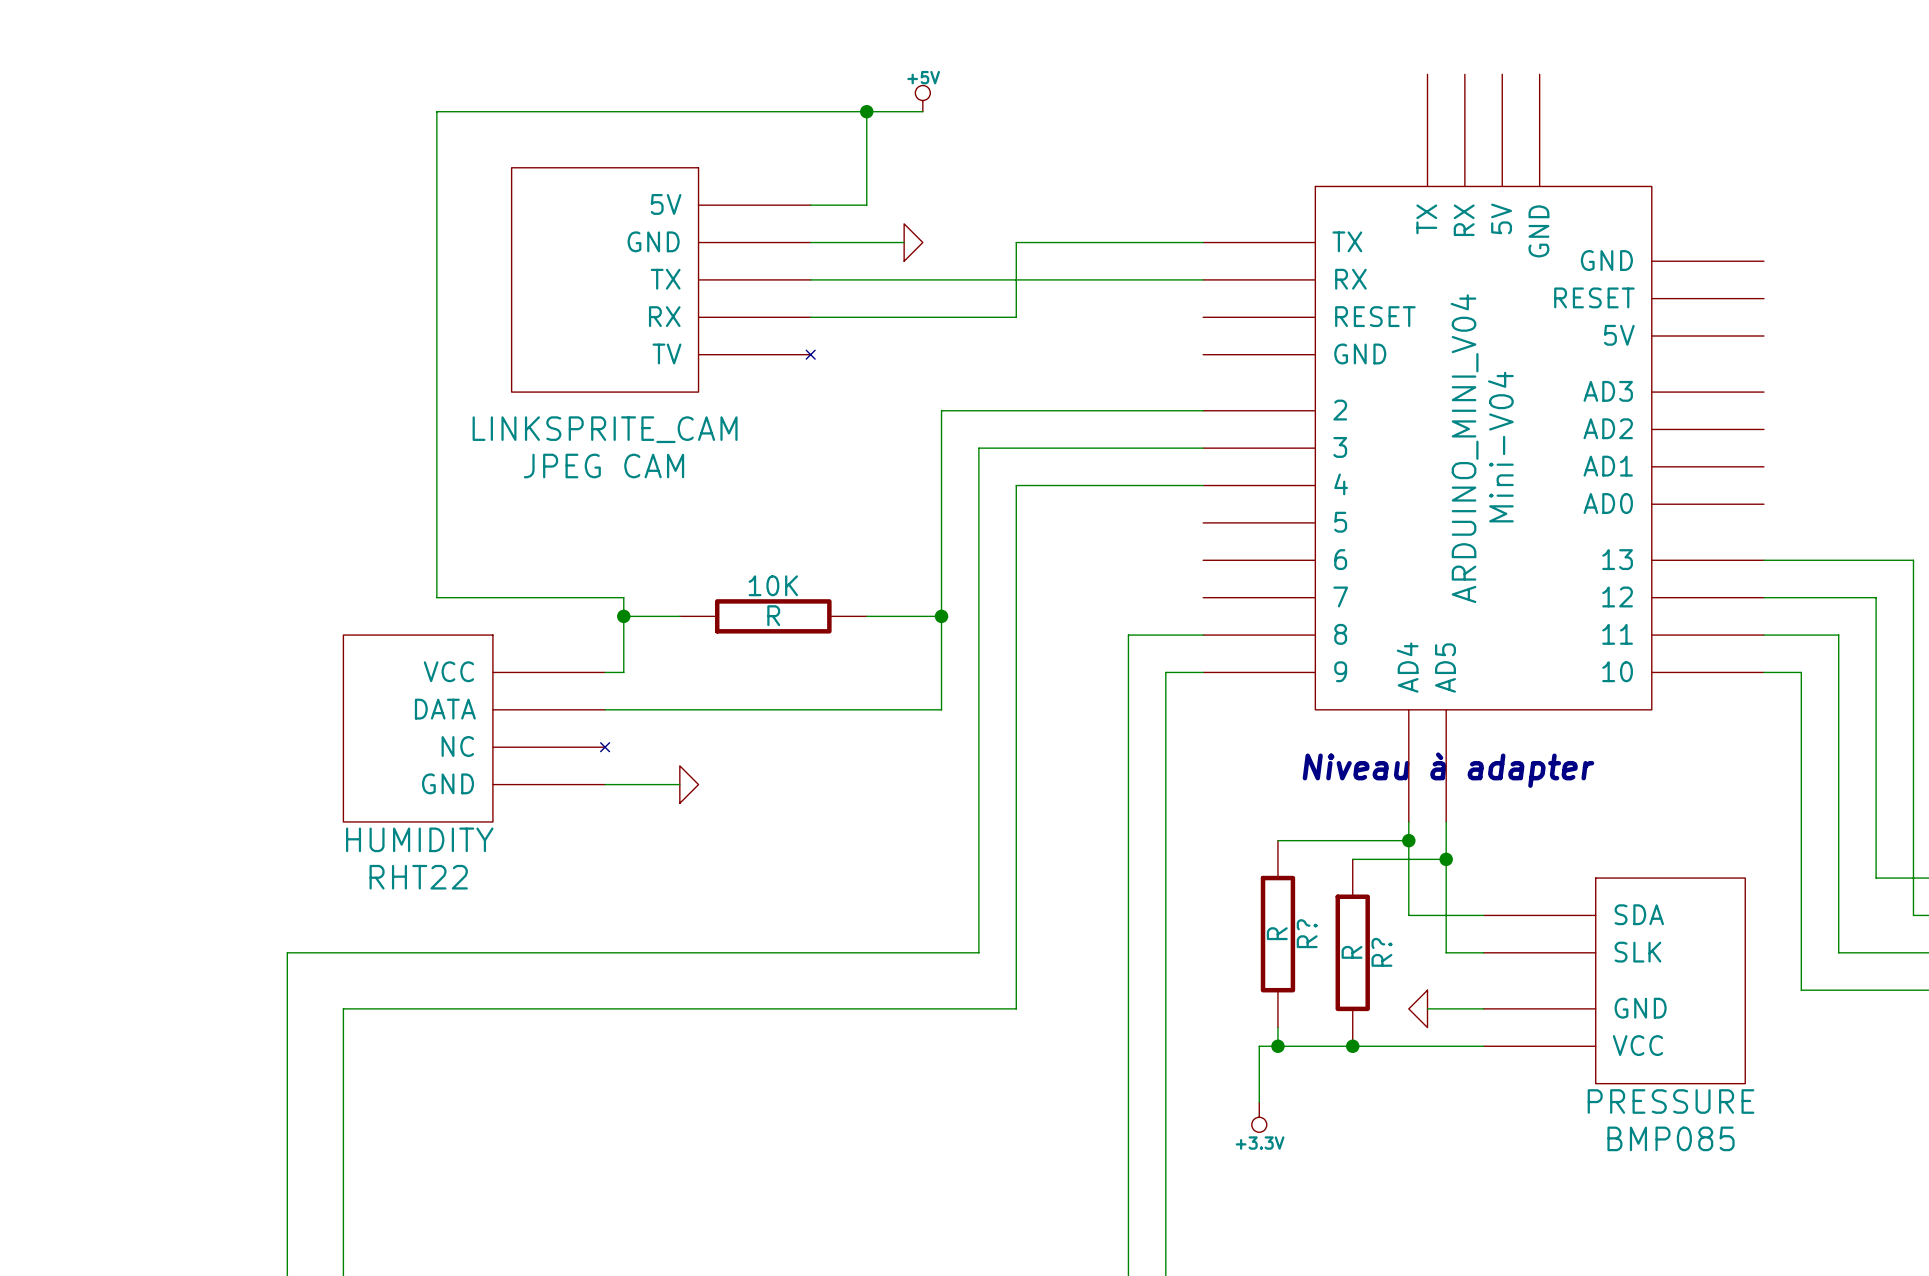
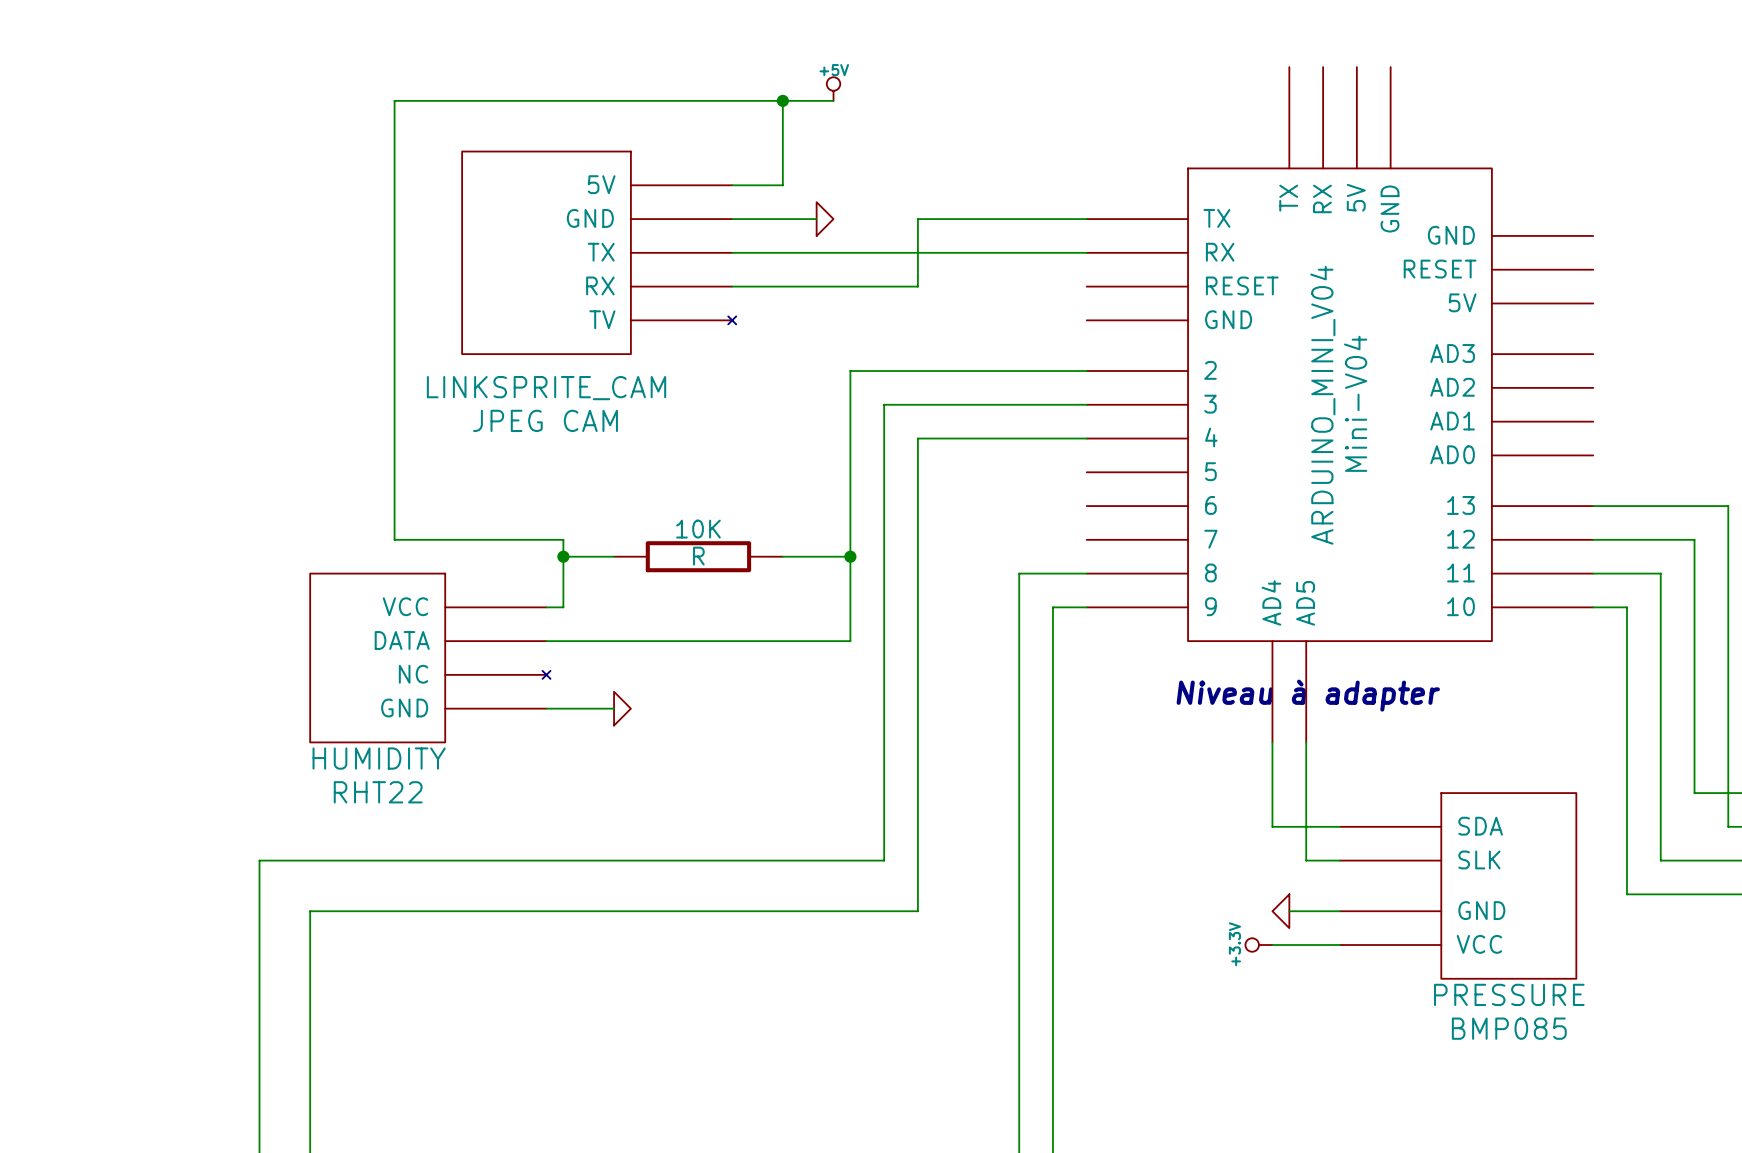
wire: (1277, 840) (1408, 840) -> none
junction: (1408, 840) -> none
wire: (1352, 859) (1446, 859) -> none
junction: (1446, 859) -> none
R?: R (1277, 934) -> none
R?: R (1352, 952) -> none
wire: (1277, 1027) (1277, 1046) -> none
junction: (1277, 1046) -> none
junction: (1352, 1046) -> none
wire: (1408, 1046) (1259, 1046) (1259, 1102) -> none
power symbol rotation: 0° (1259, 1117) -> 90° clockwise (1258, 945)
power symbol position: +3.3V (1259, 1117) -> +3.3V (1258, 945)

